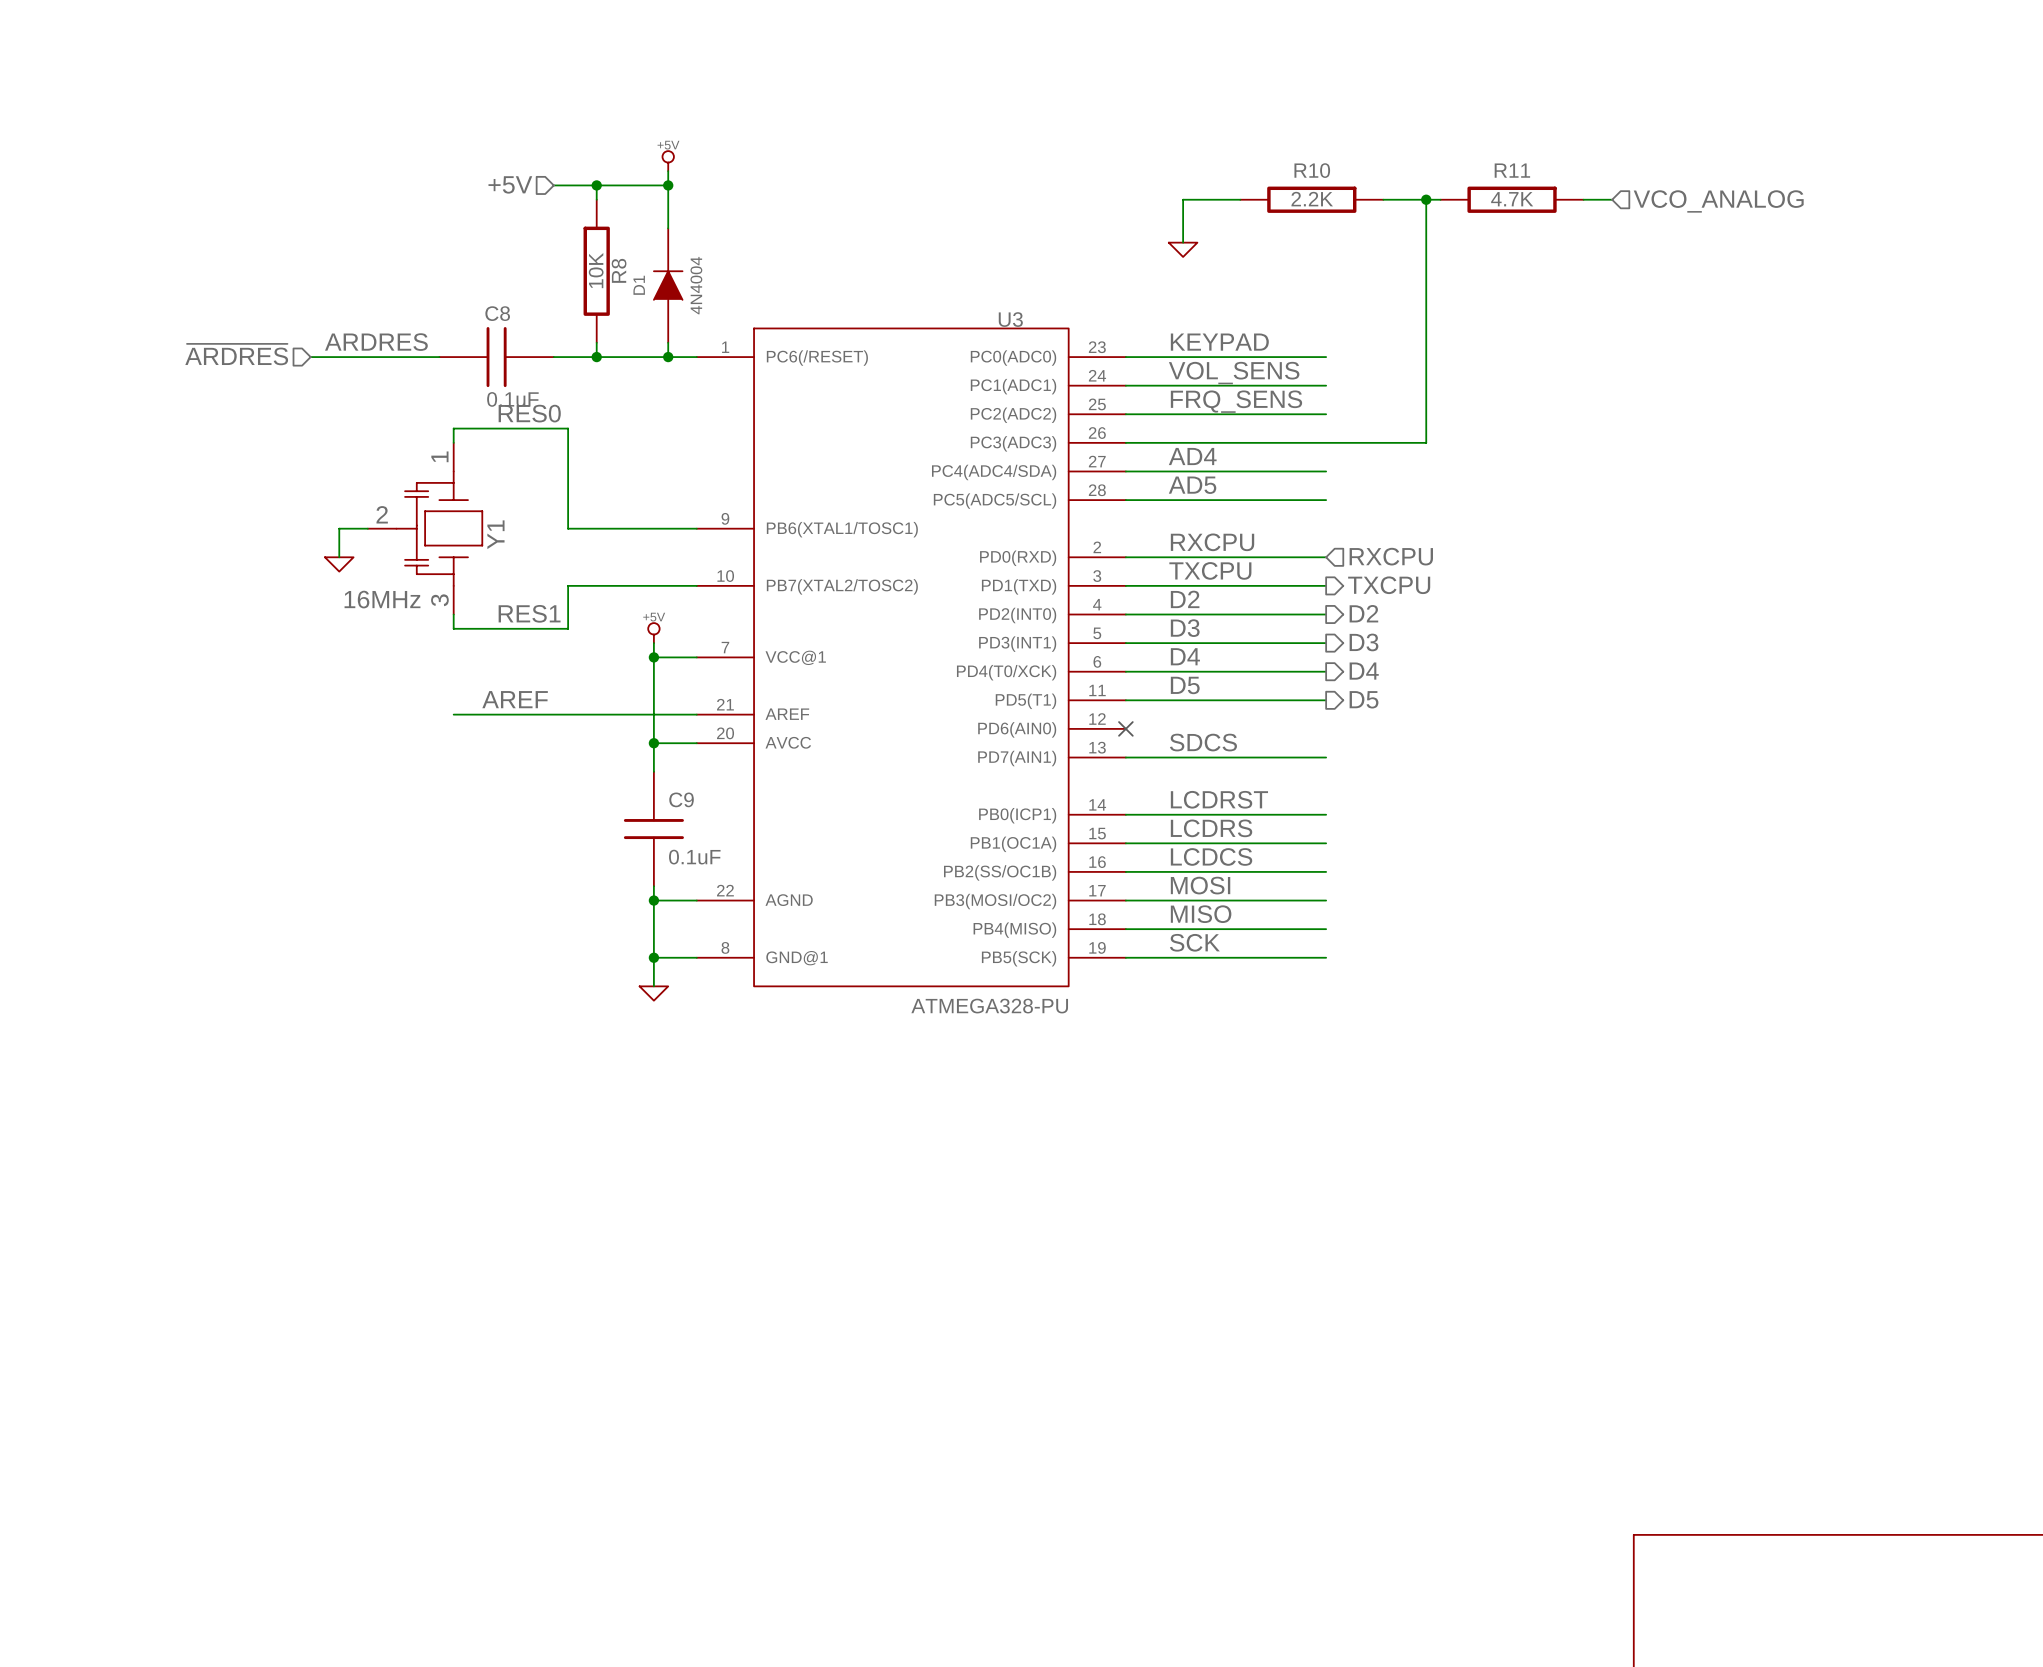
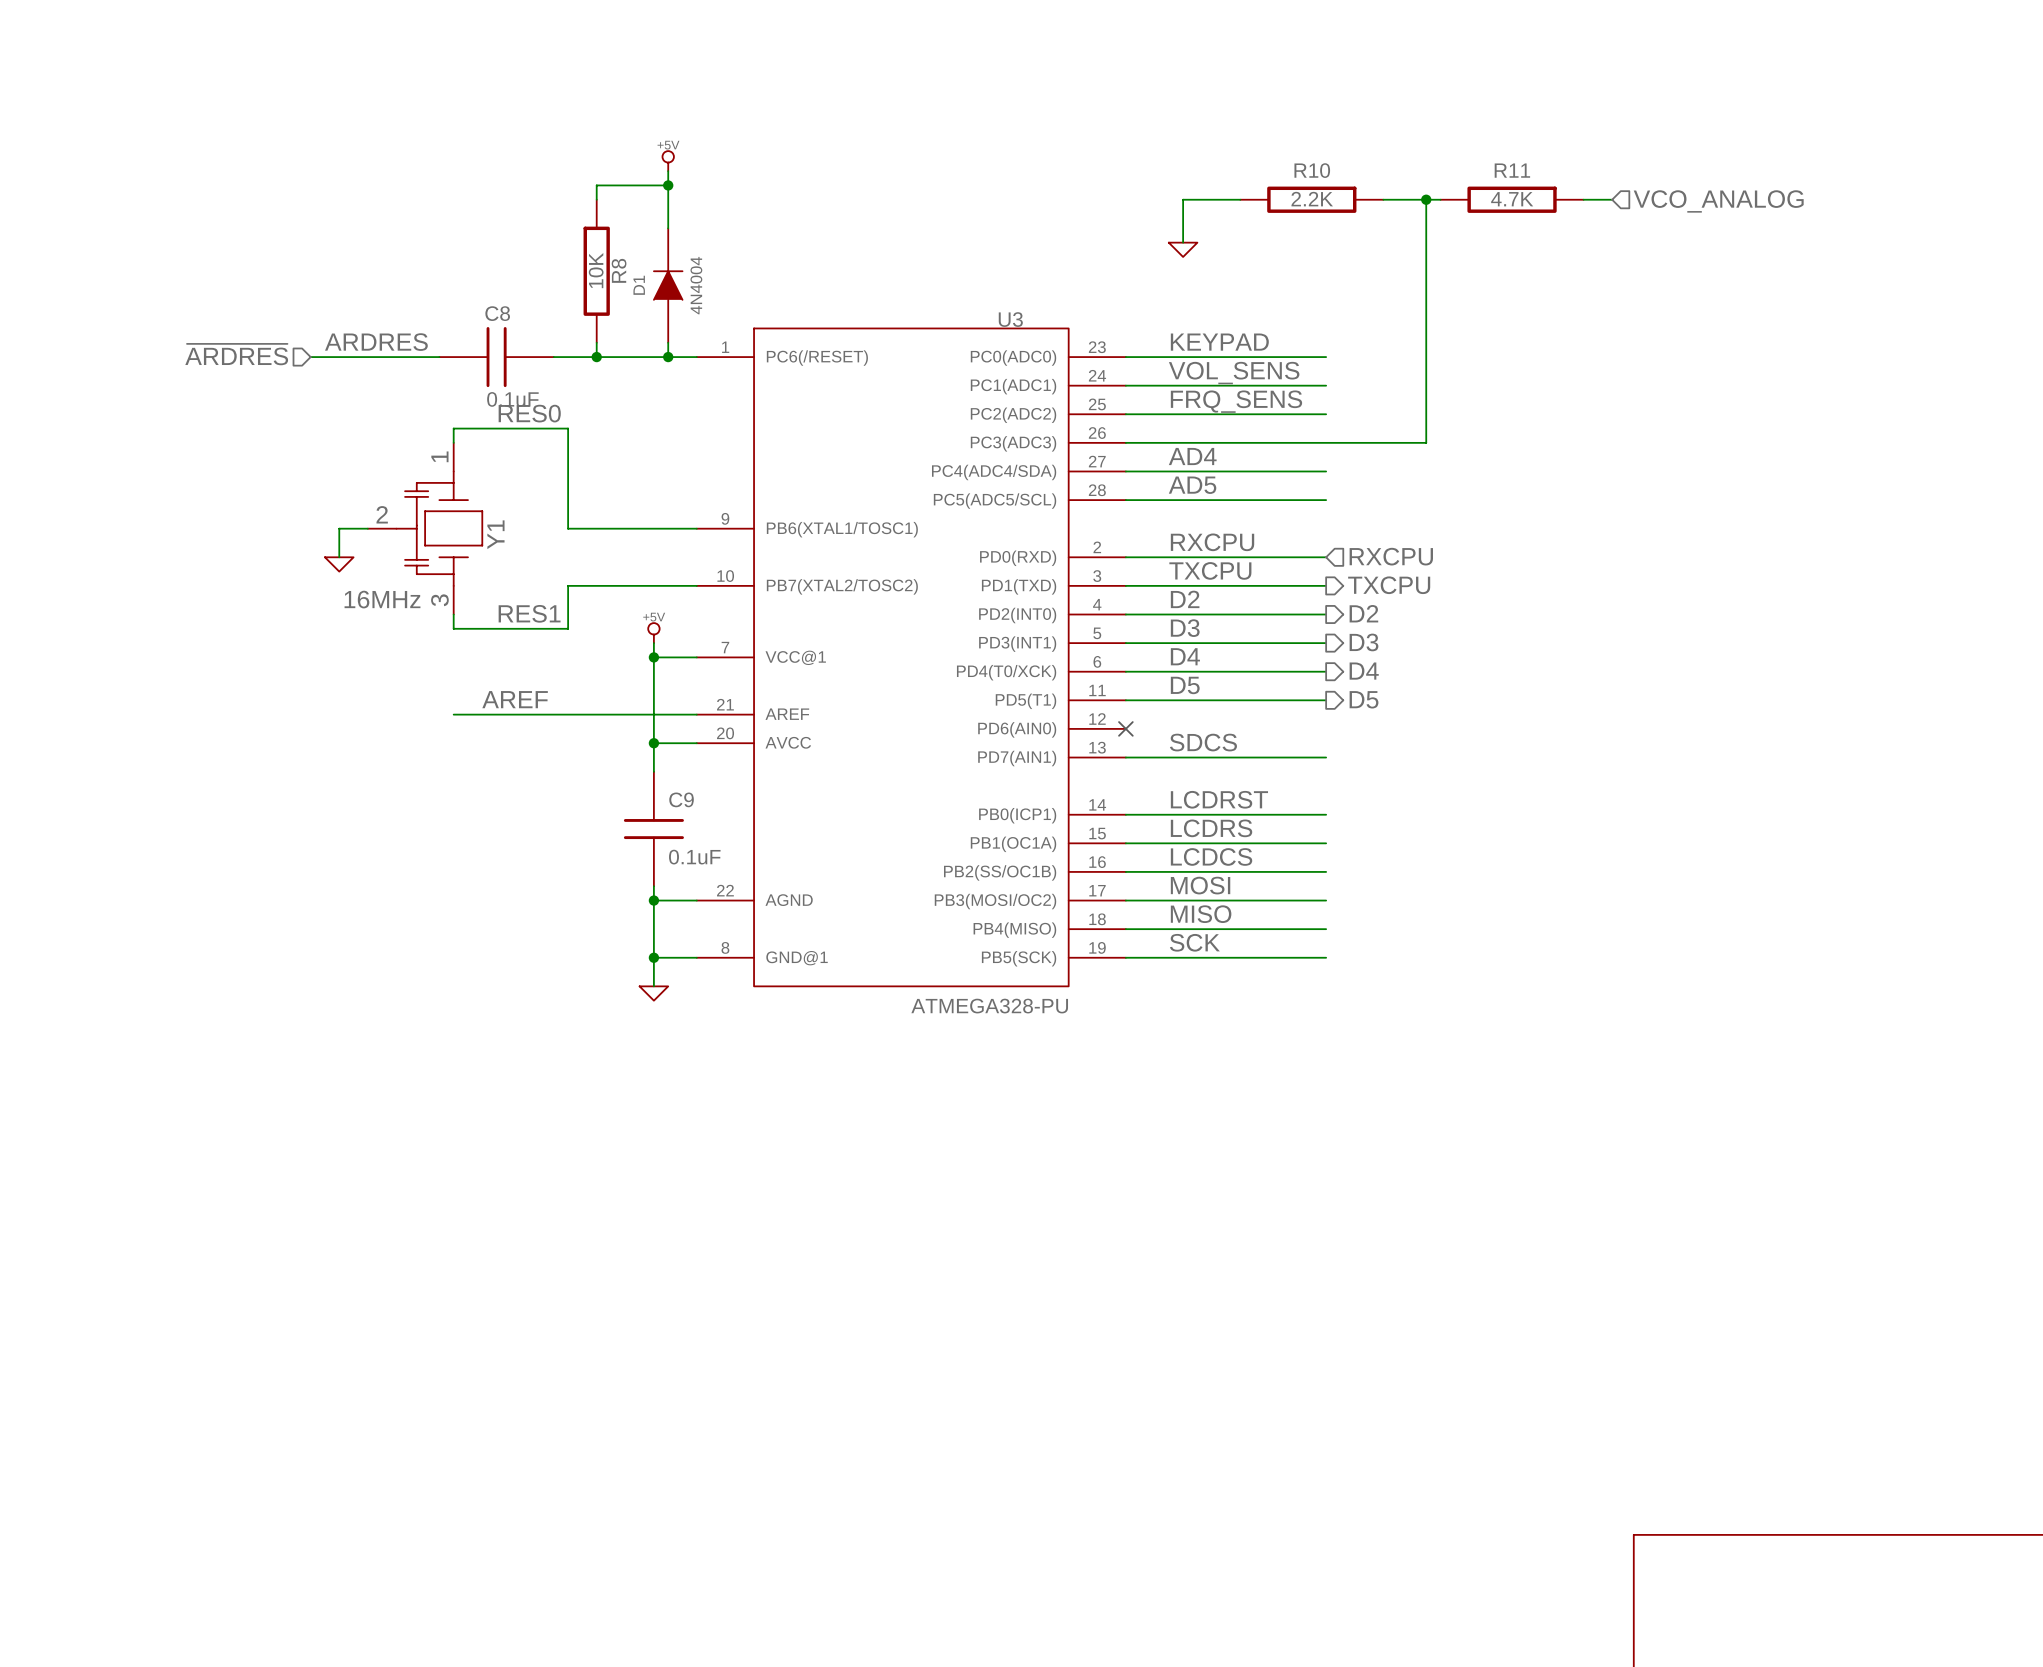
hierarchical label: +5V (510, 184) -> none
wire: (553, 185) (596, 185) -> none
junction: (596, 185) -> none

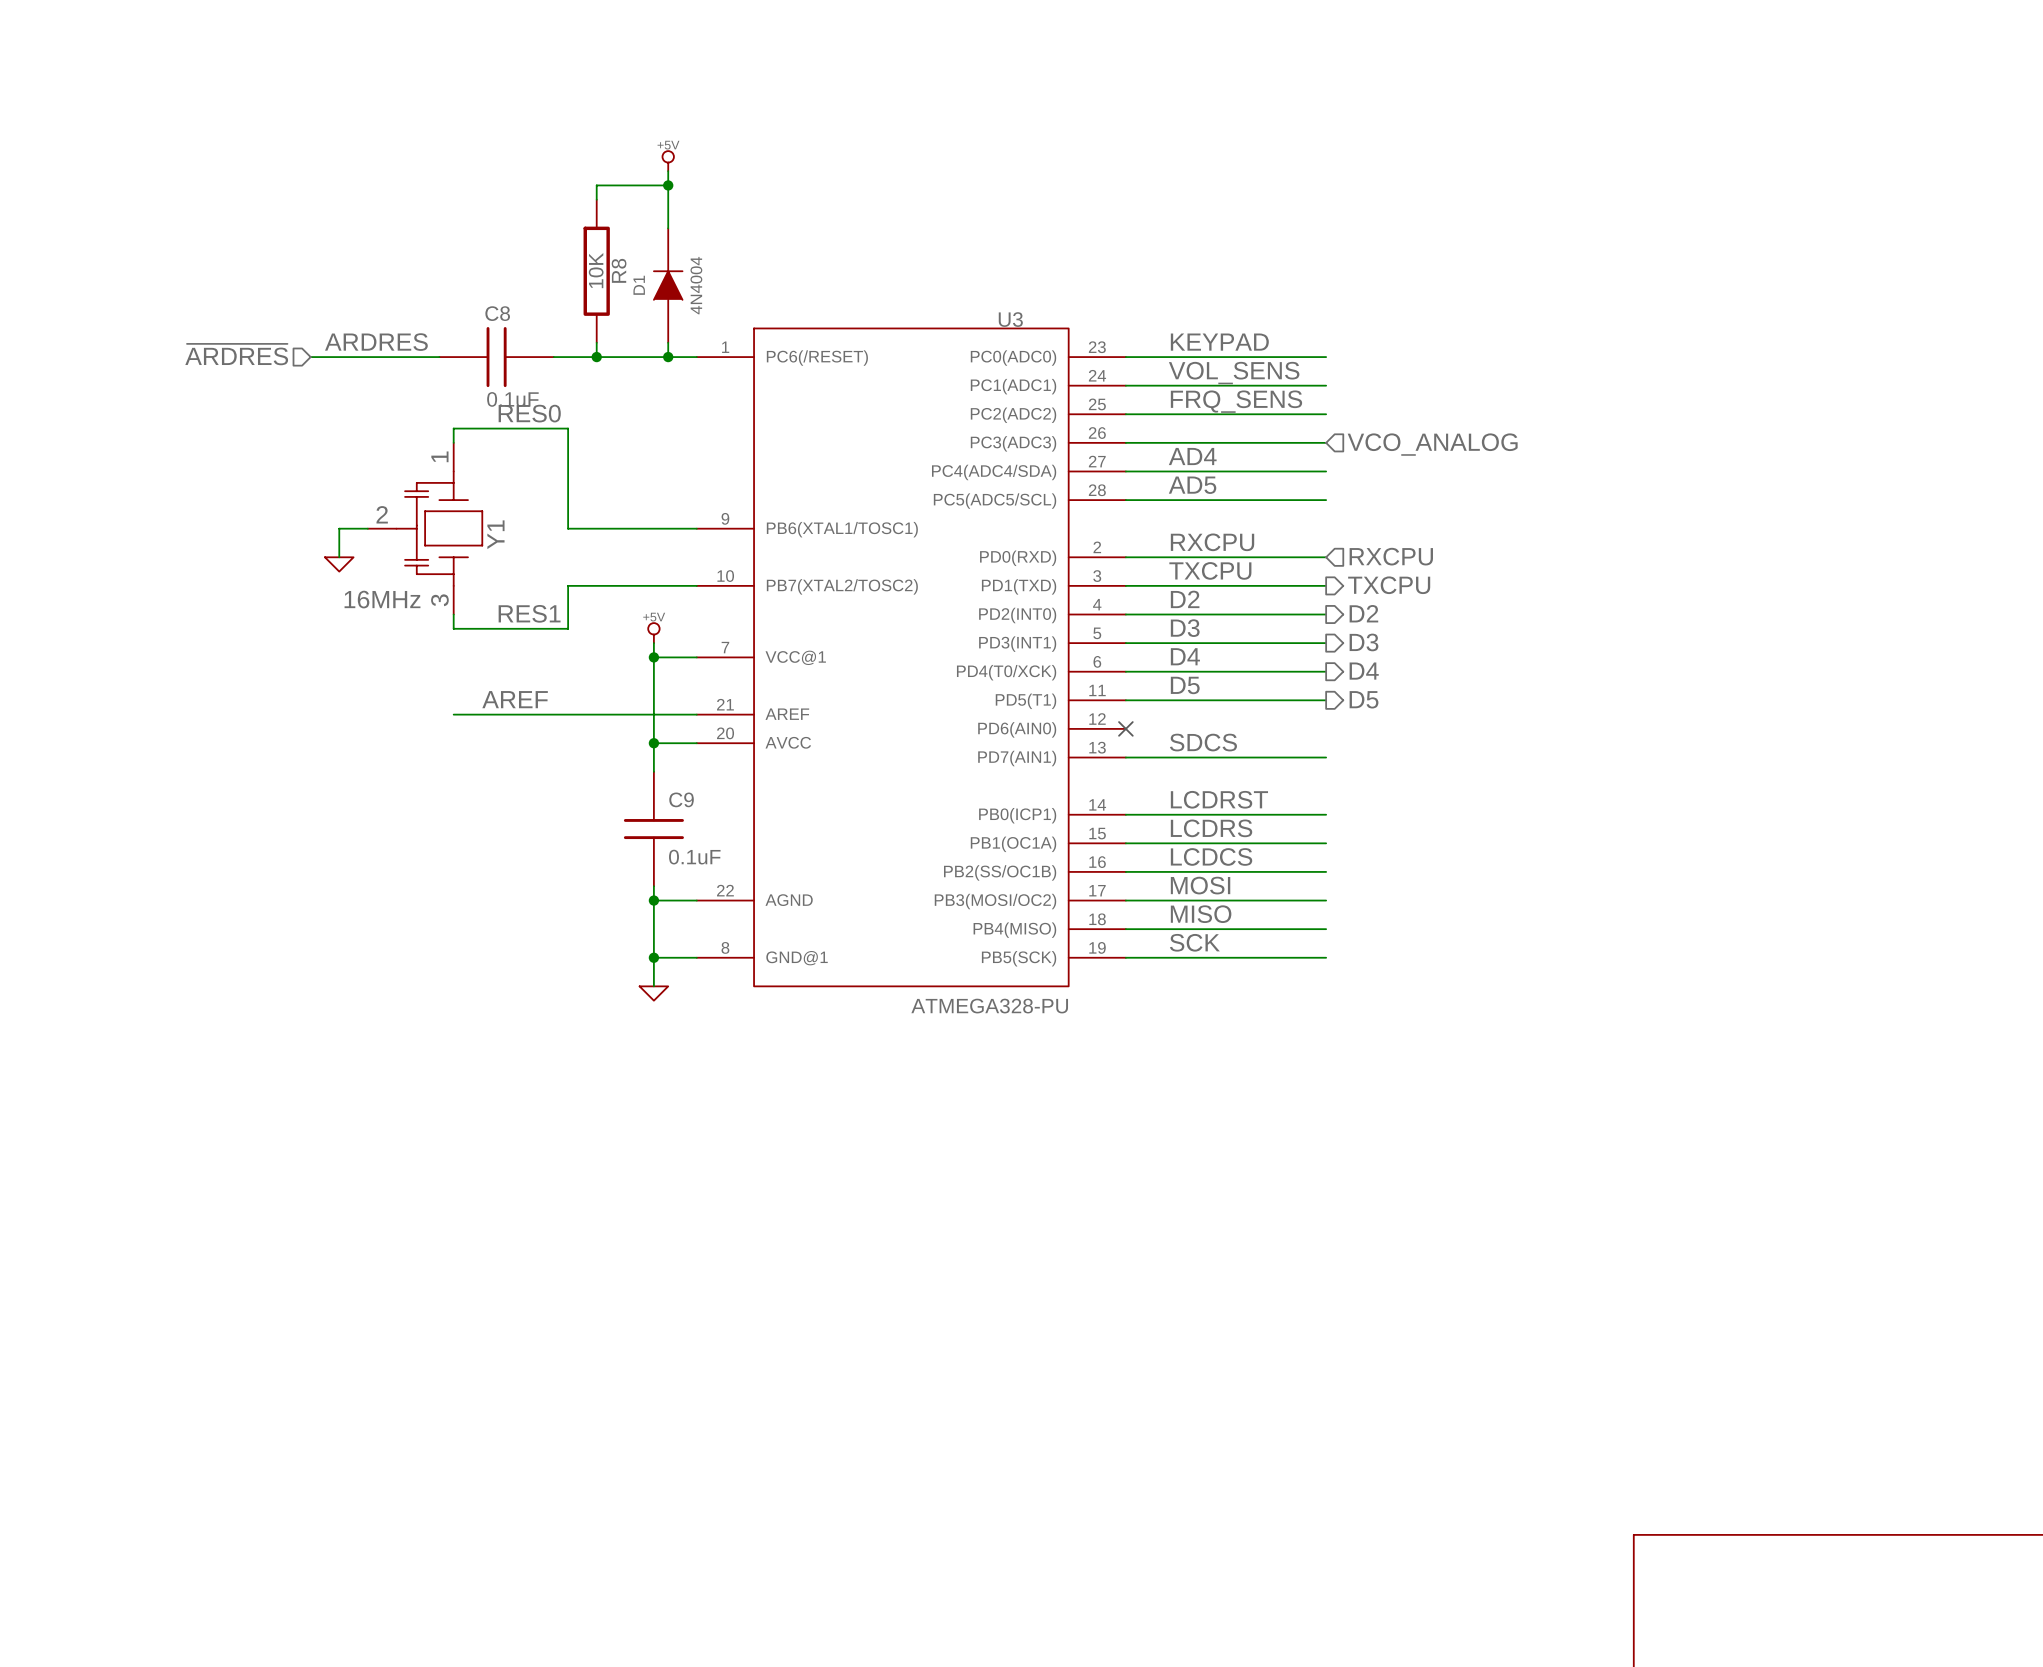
wire: (1240, 199) (1183, 199) (1183, 242) -> none
R10: 2.2K (1311, 199) -> none
wire: (1383, 199) (1440, 199) -> none
wire: (1426, 199) (1426, 442) (1326, 442) -> none
junction: (1426, 199) -> none
R11: 4.7K (1512, 199) -> none
wire: (1583, 199) (1612, 199) -> none
hierarchical label: VCO_ANALOG (1718, 201) -> none
power symbol: (1183, 249) -> none
hierarchical label: none -> VCO_ANALOG (1432, 444)

